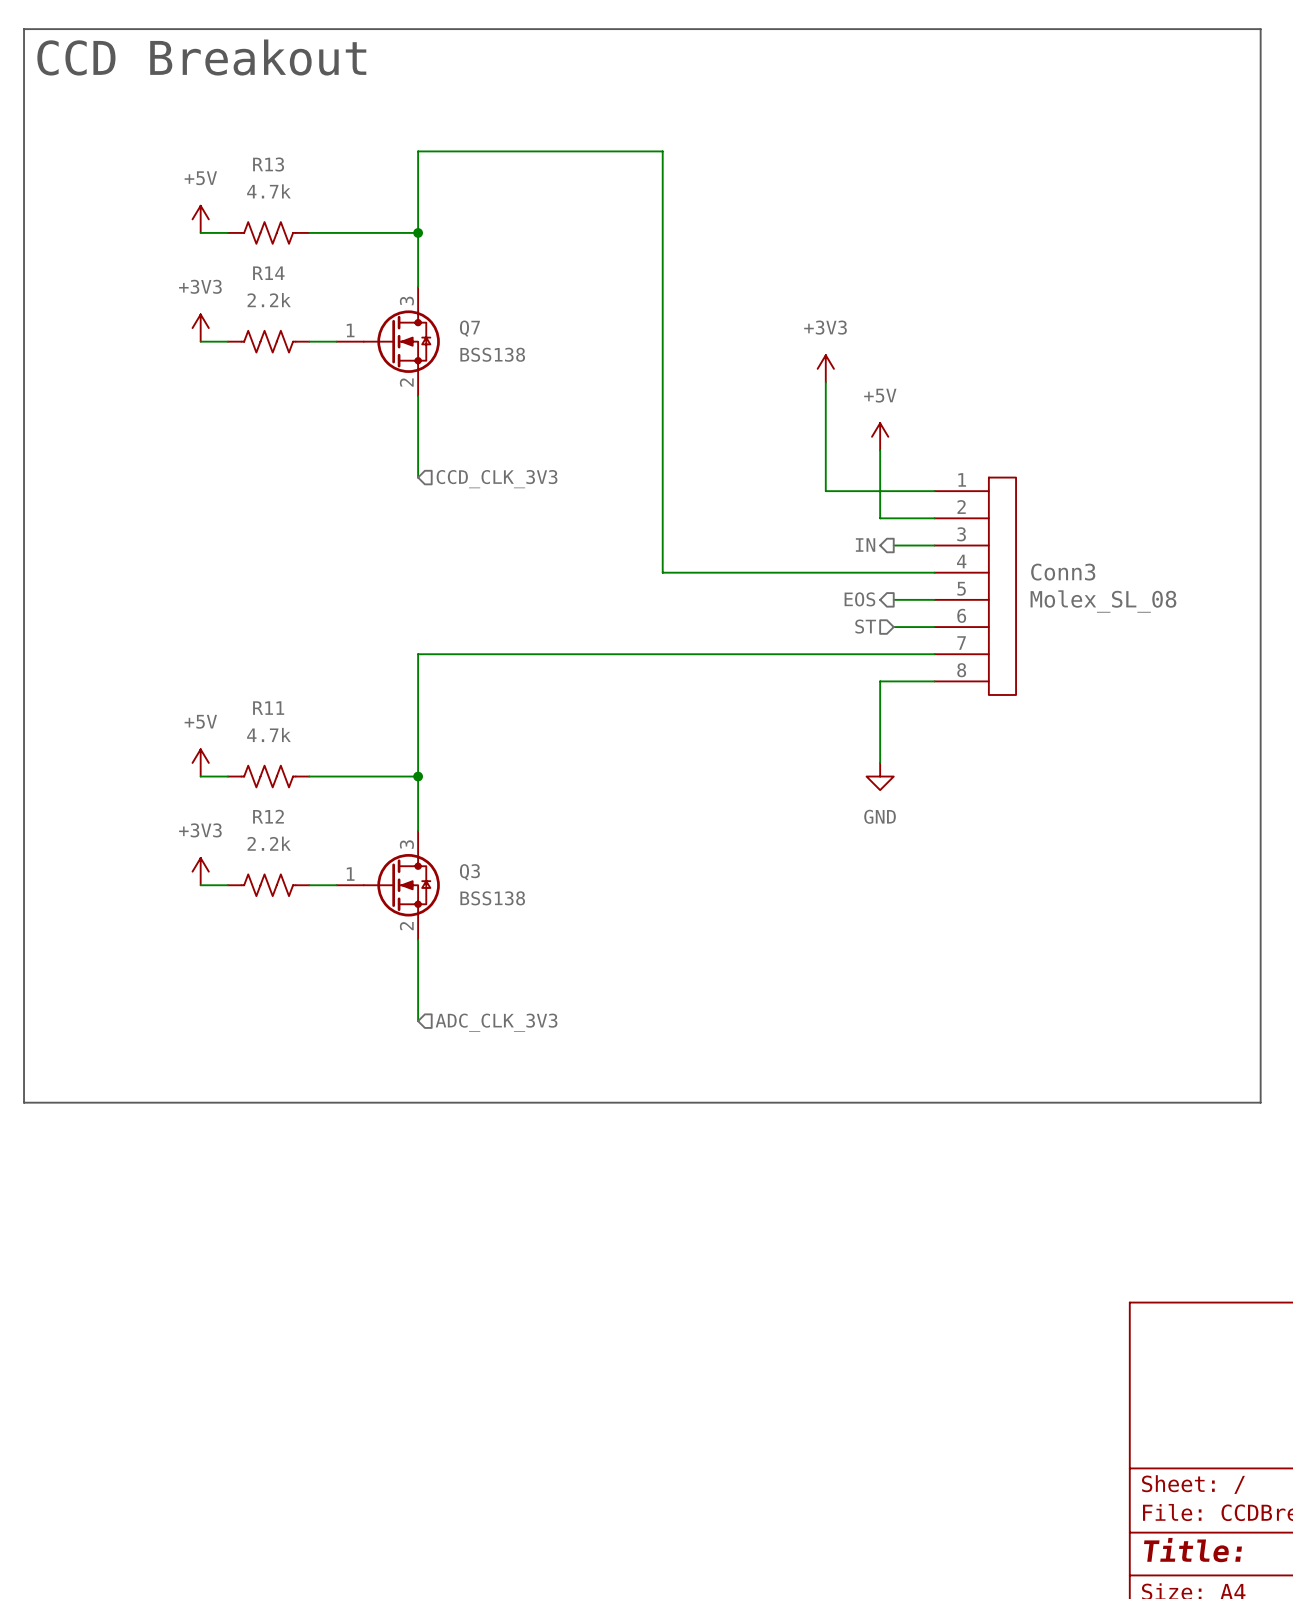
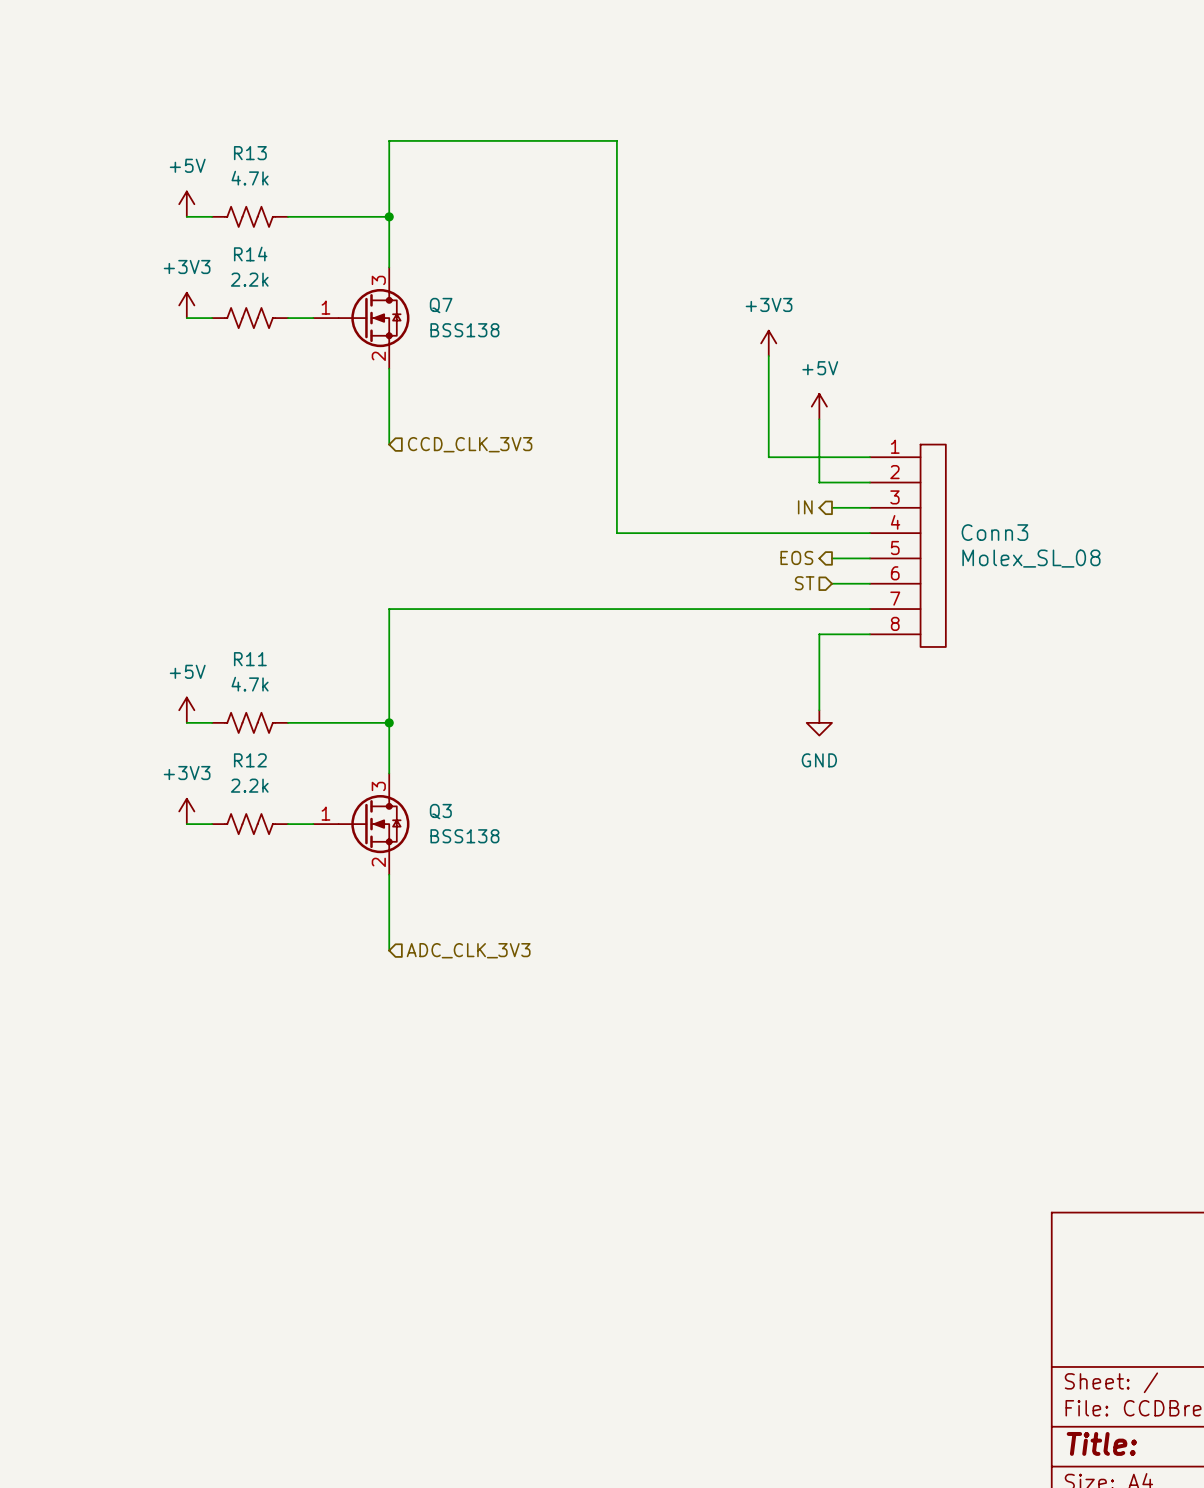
line: (24, 29) (1260, 29) (1260, 1102) (24, 1102) (24, 29) -> none
text: CCD Breakout (201, 57) -> none

